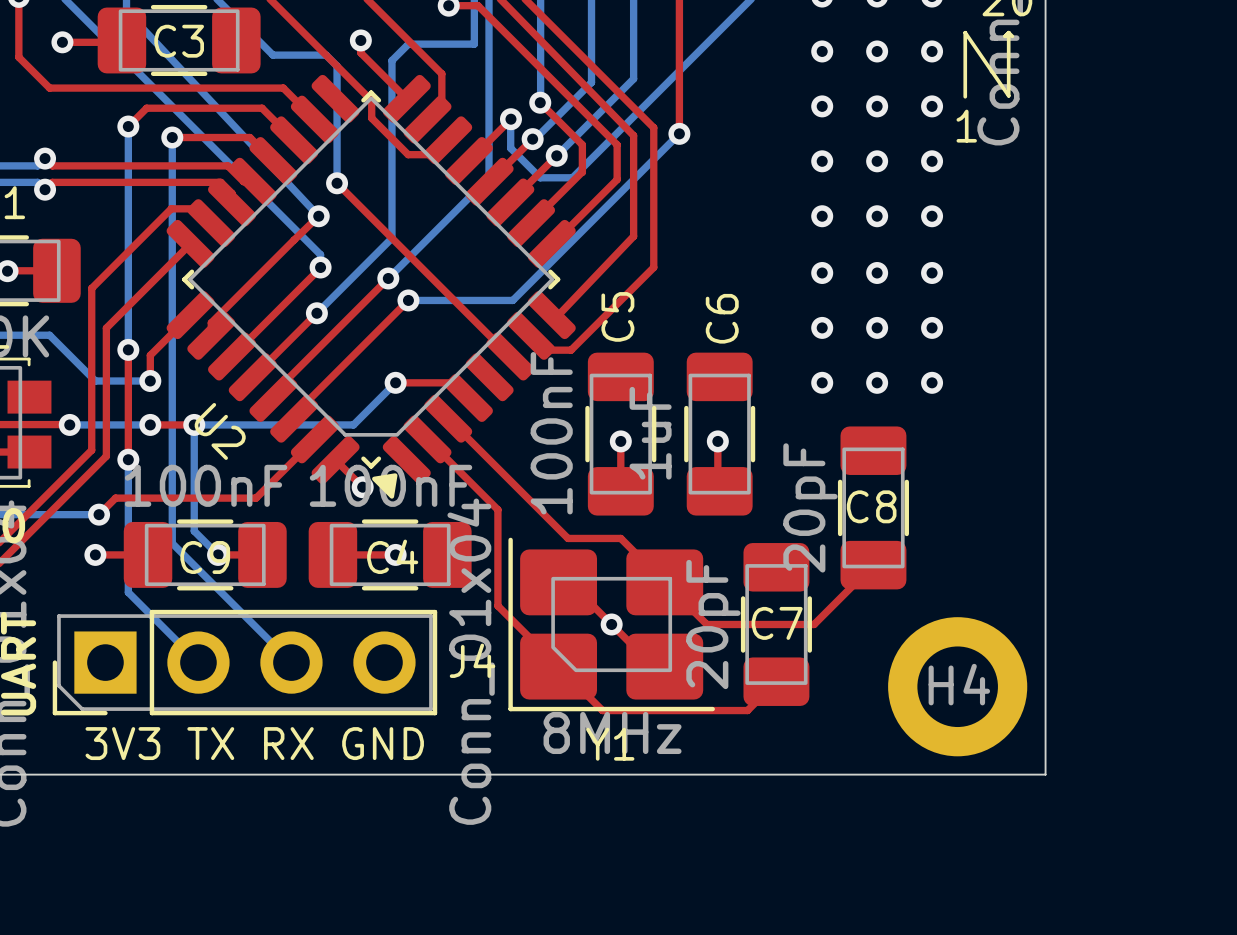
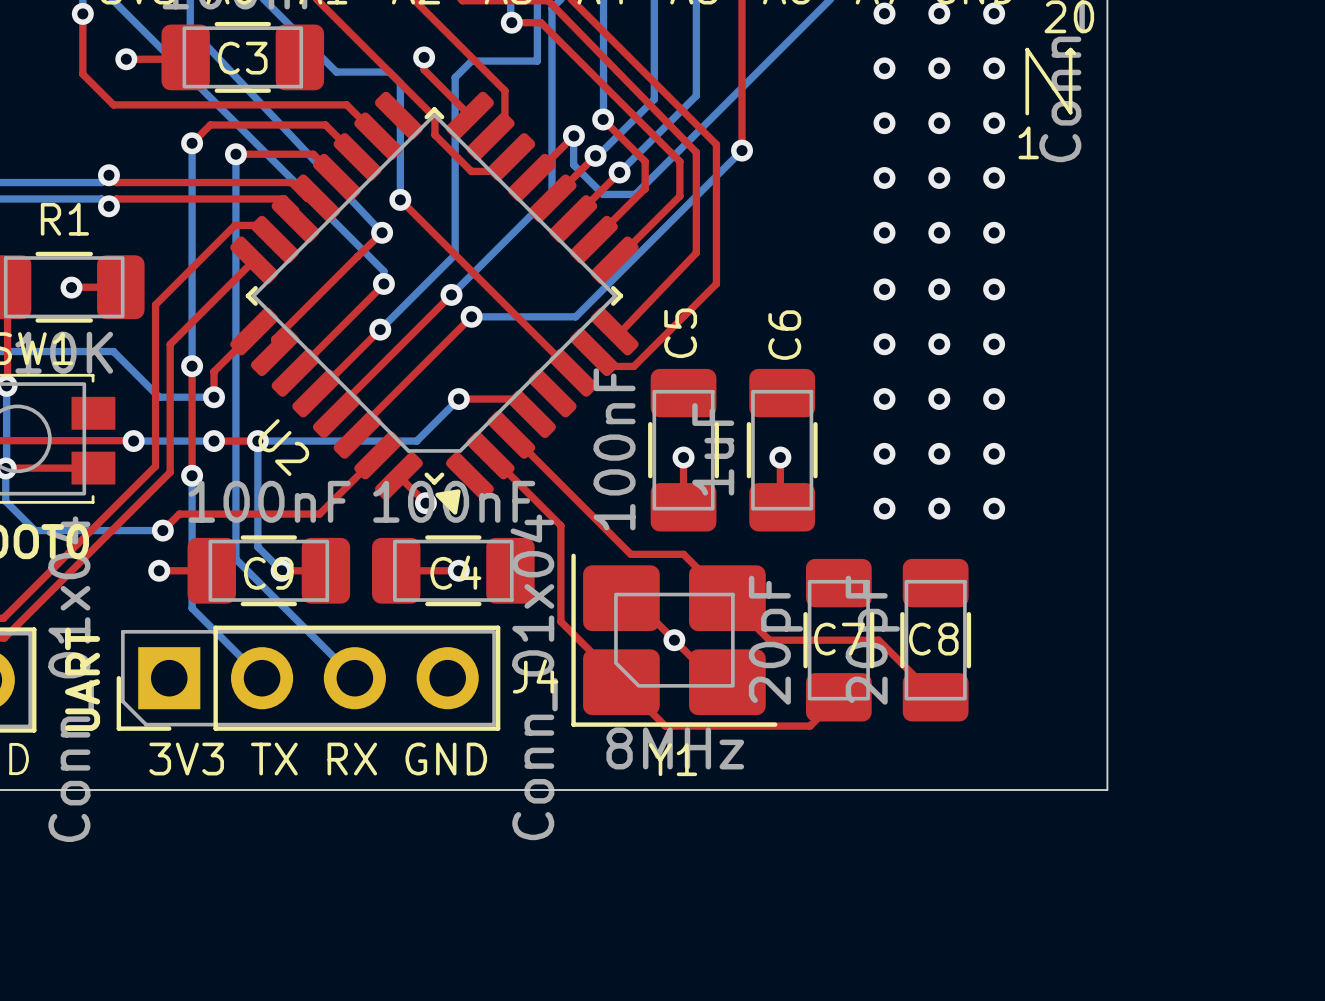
via: none -> (884, 453)
via: none -> (939, 453)
via: none -> (994, 453)
via: none -> (884, 508)
via: none -> (939, 508)
via: none -> (994, 508)
C8 position: (873, 507) -> (935, 640)
top track: (873, 565) (814, 624) -> (935, 697) (876, 640)
H4: (957, 686) -> none

